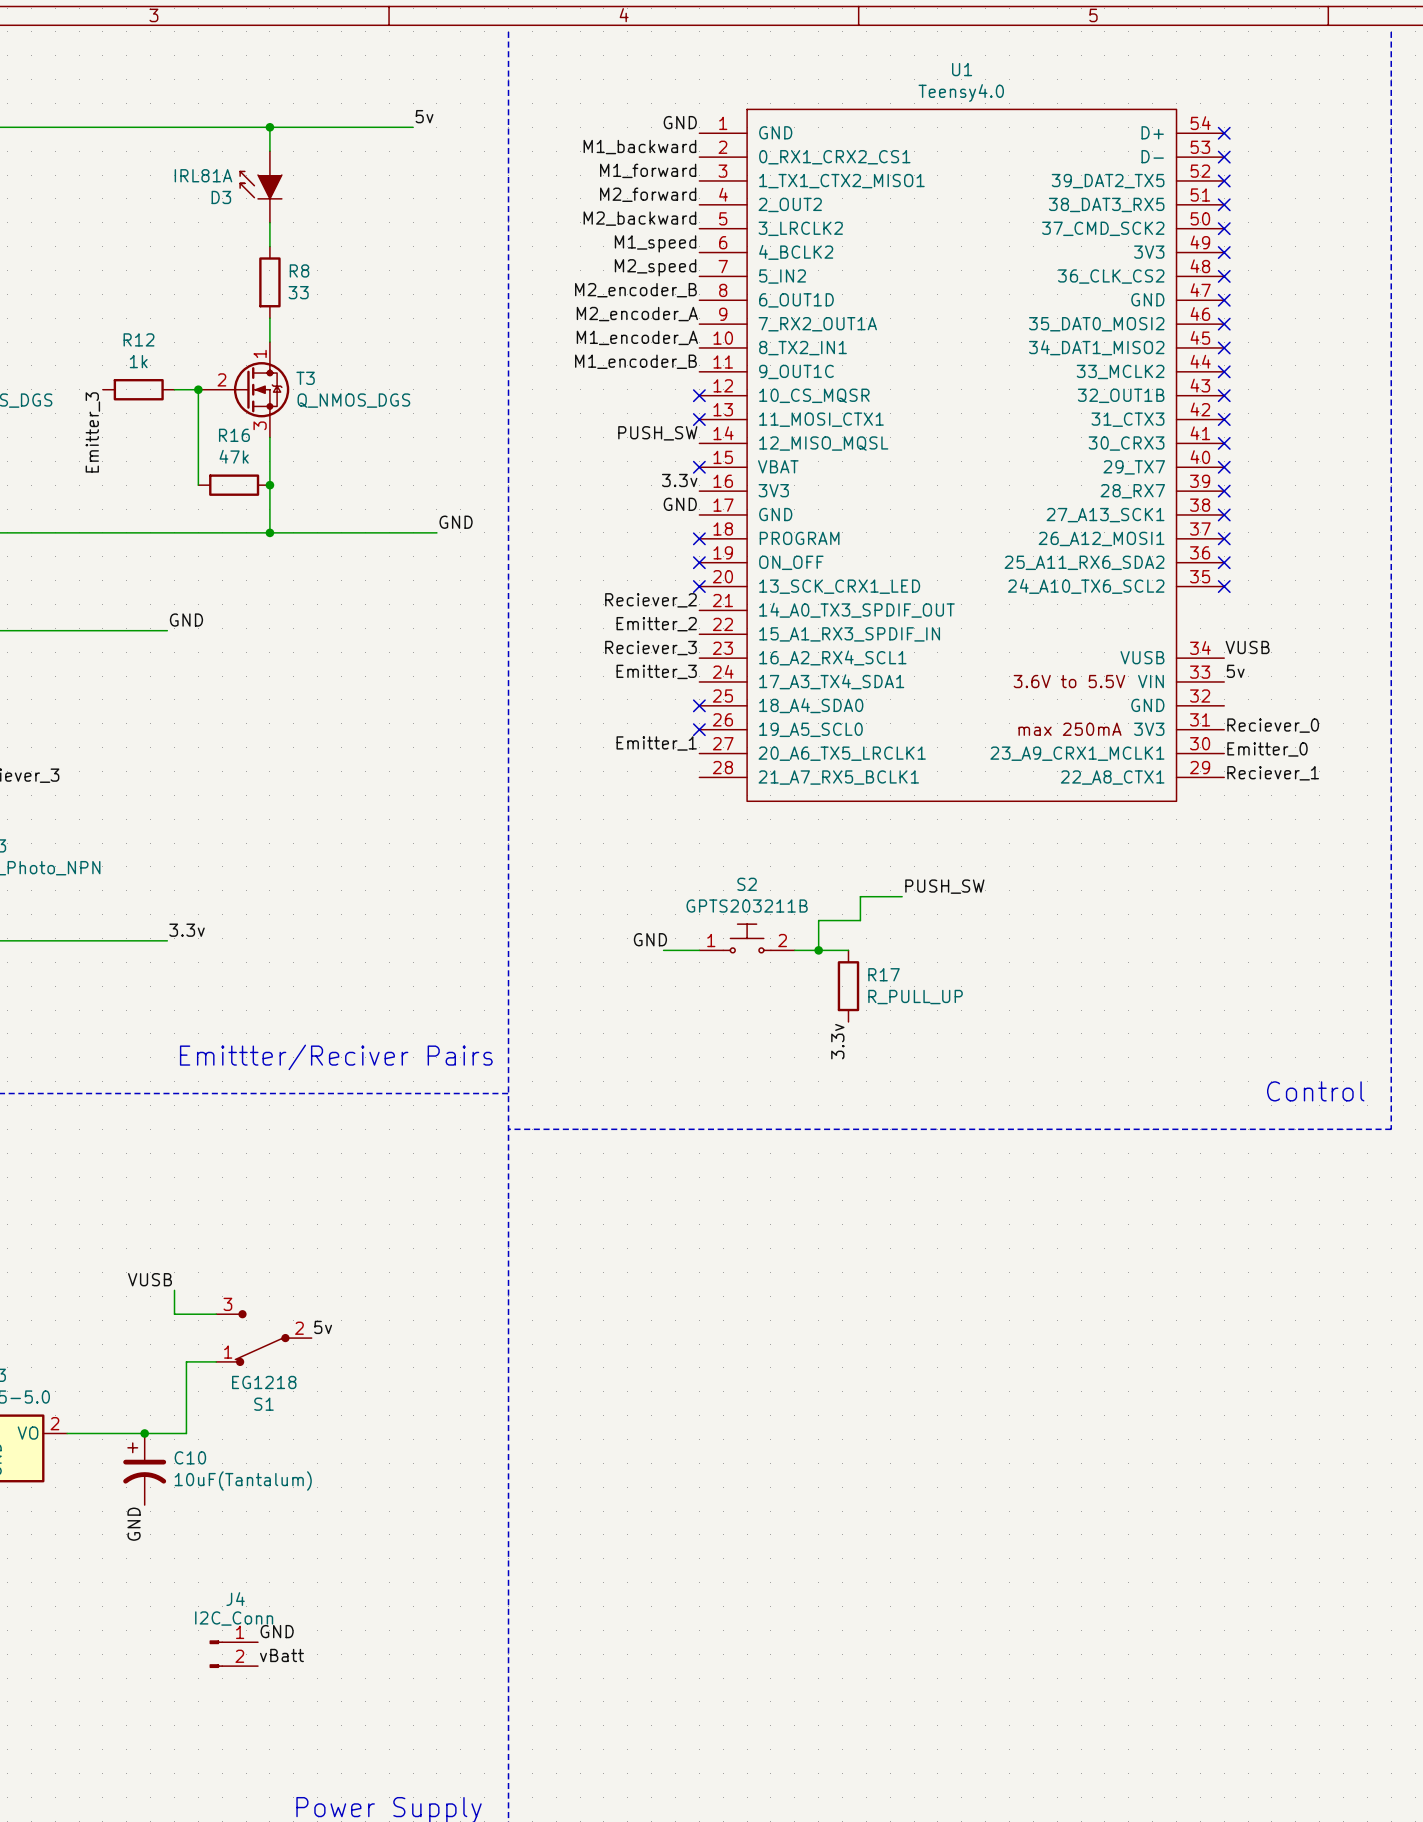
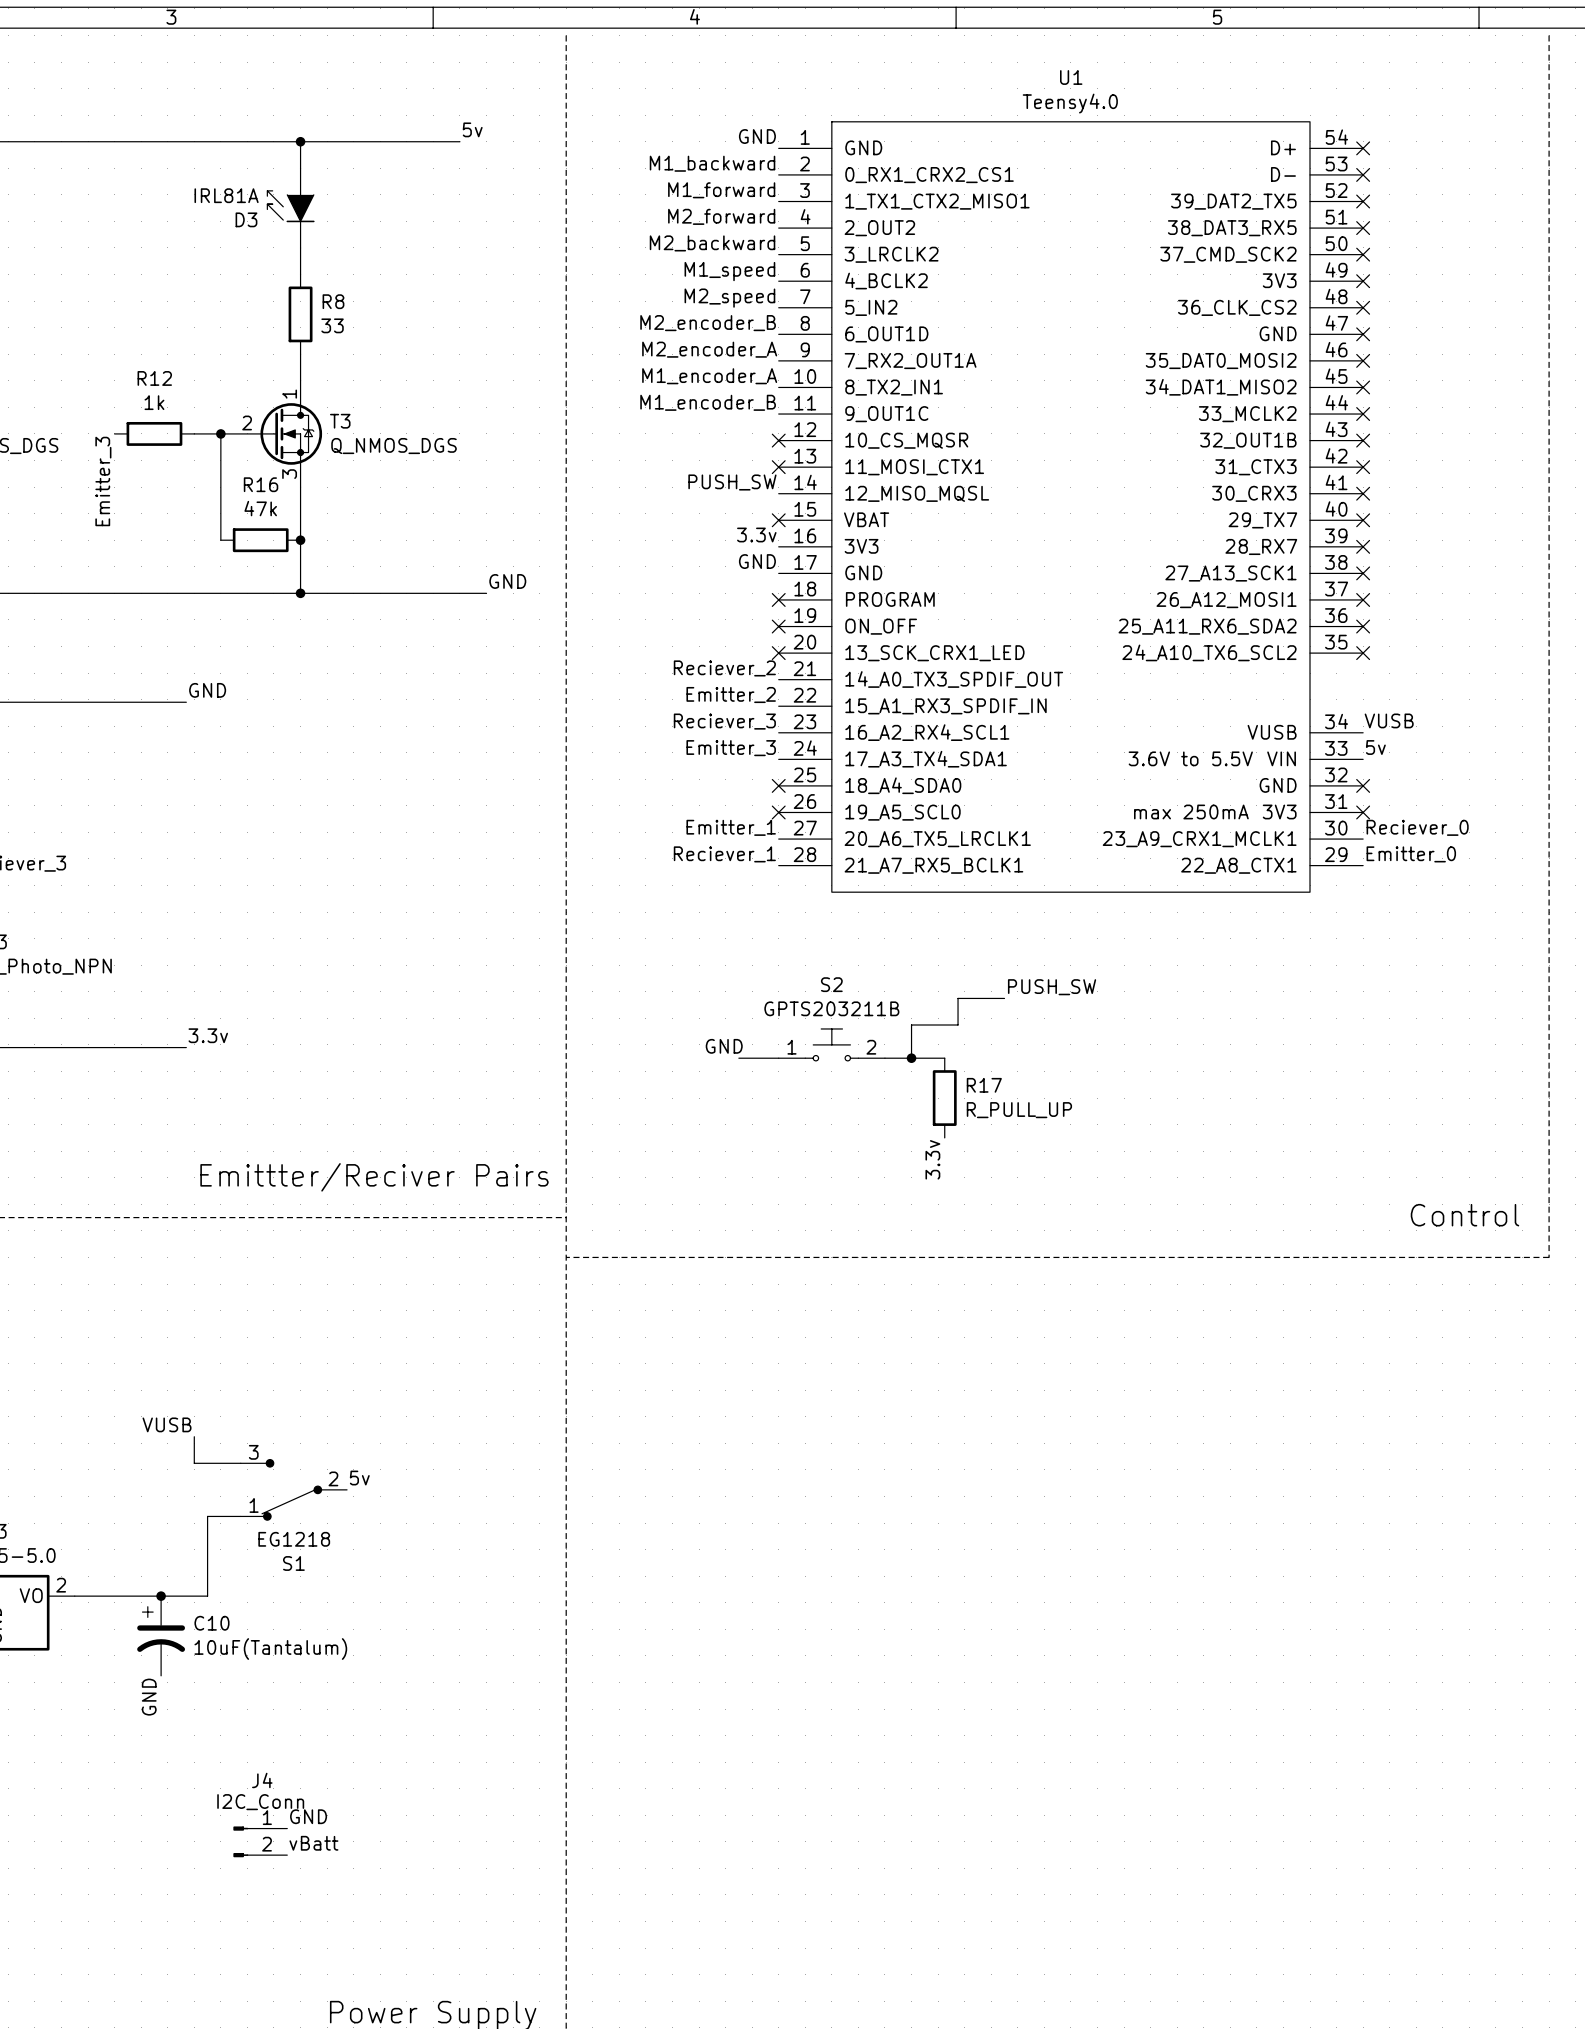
no-connect mark: none -> (1363, 785)
label: Reciever_0 (1273, 725) -> none
no-connect mark: none -> (1363, 812)
label: Emitter_0 (1267, 749) -> Reciever_0 (1417, 827)
label: none -> Reciever_1 (724, 854)
label: Reciever_1 (1273, 773) -> Emitter_0 (1411, 854)

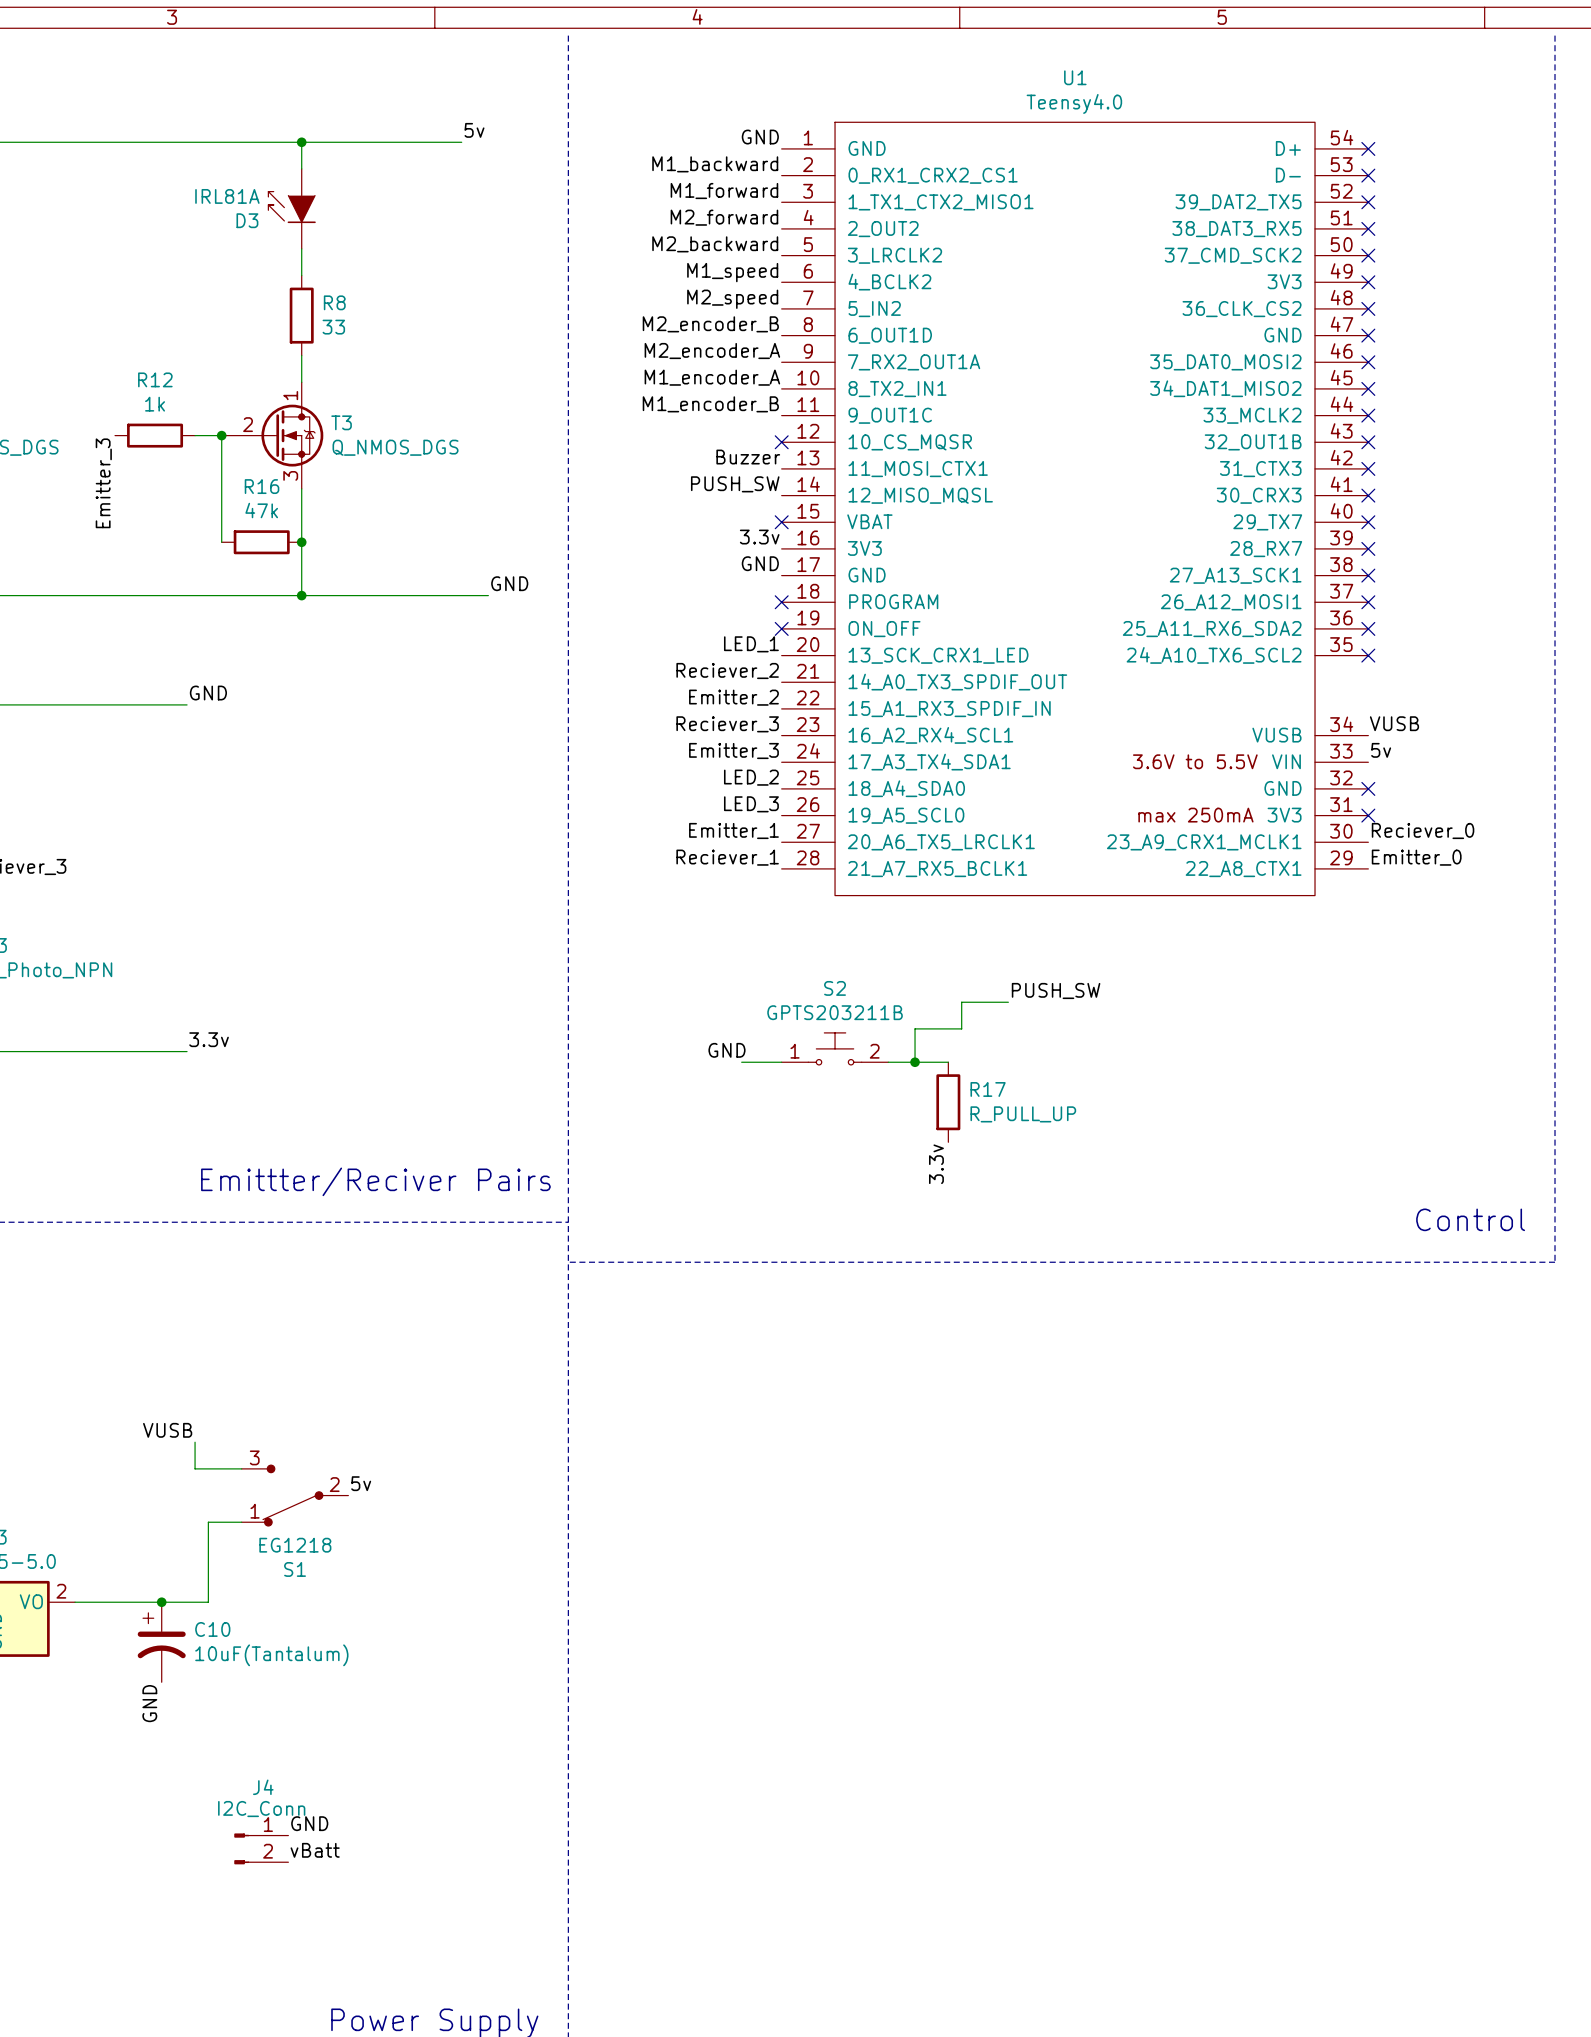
label: none -> Buzzer (748, 457)
no-connect mark: (778, 467) -> none
label: none -> LED_1 (751, 644)
no-connect mark: (778, 653) -> none
label: none -> LED_2 (751, 777)
no-connect mark: (778, 785) -> none
label: none -> LED_3 (751, 804)
no-connect mark: (778, 812) -> none

